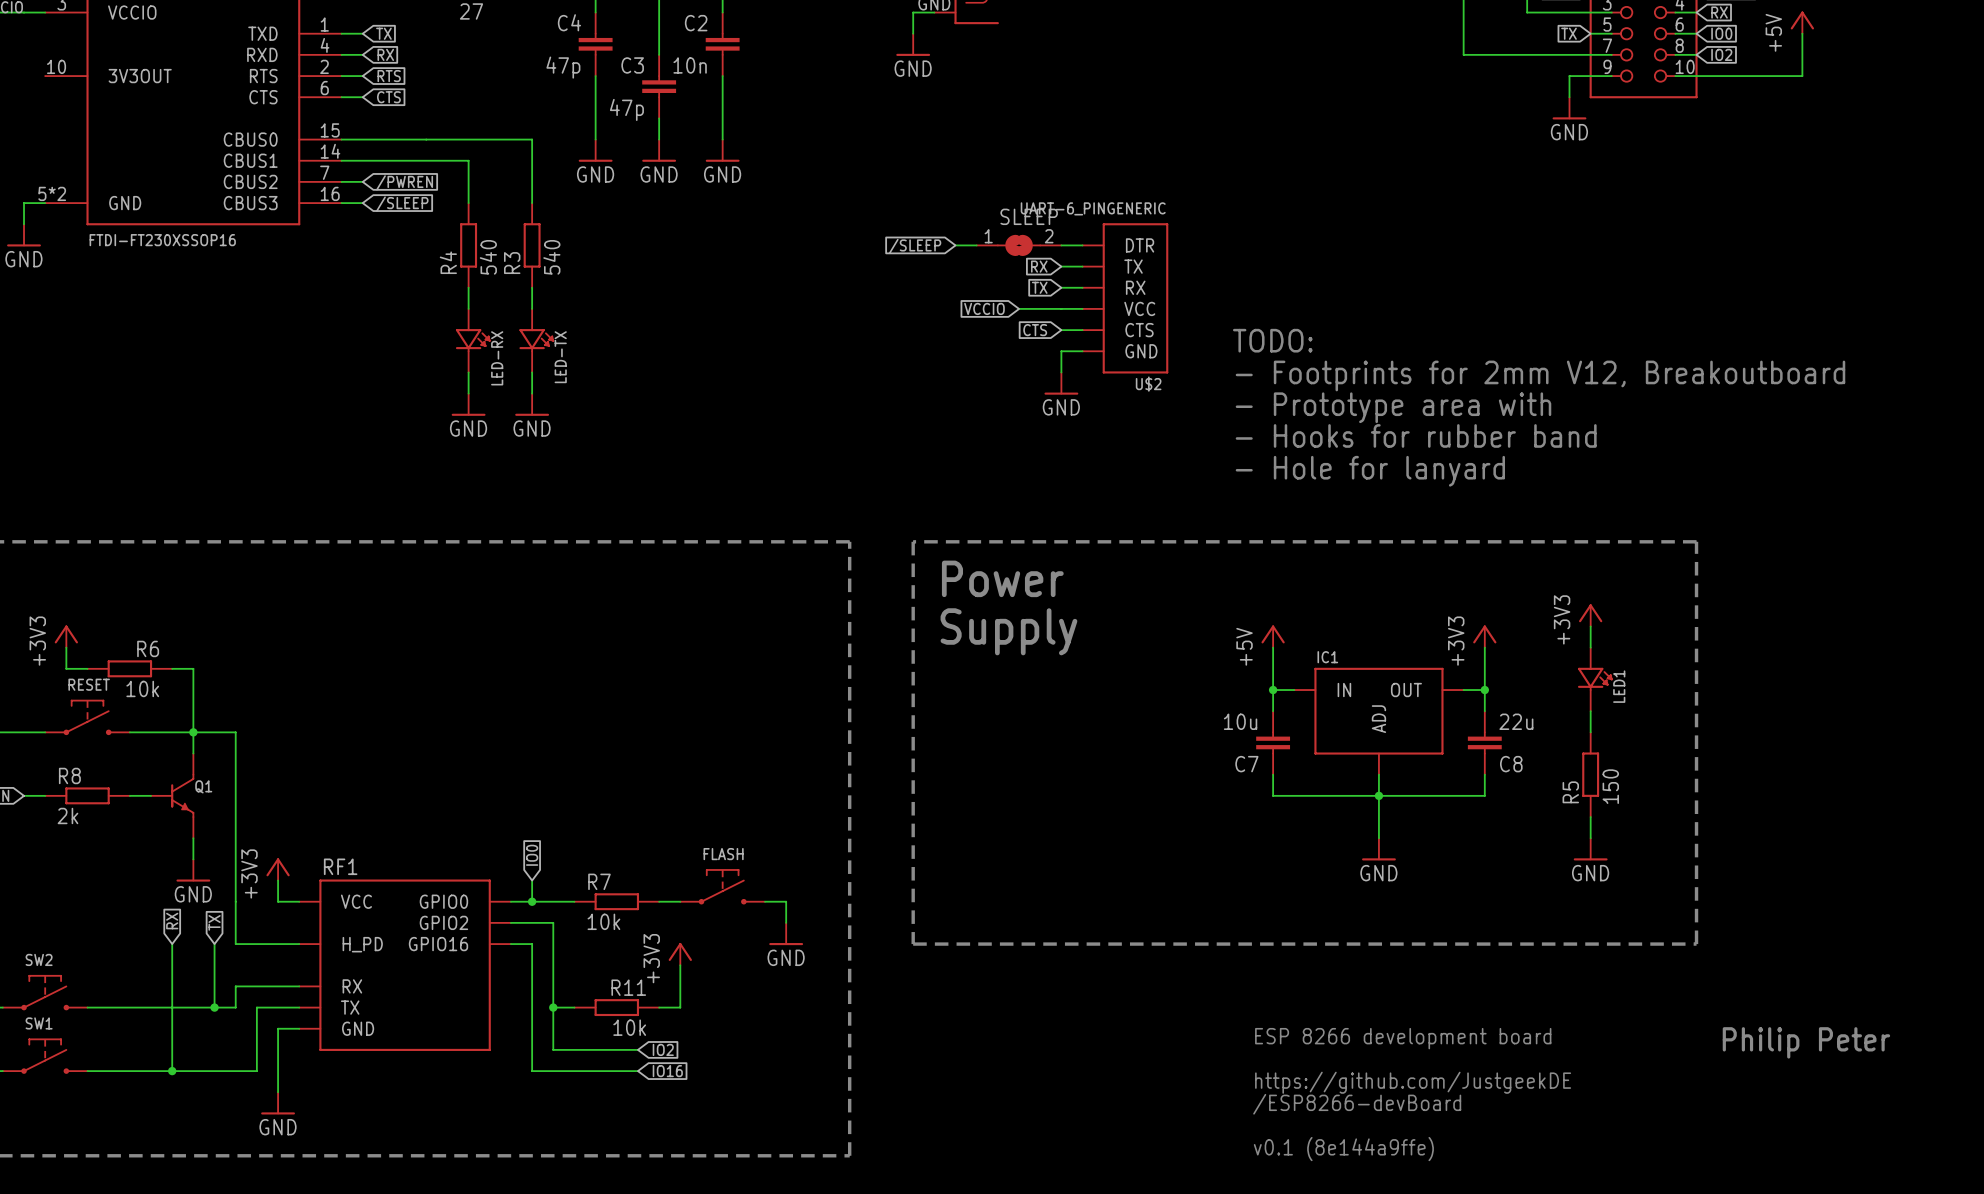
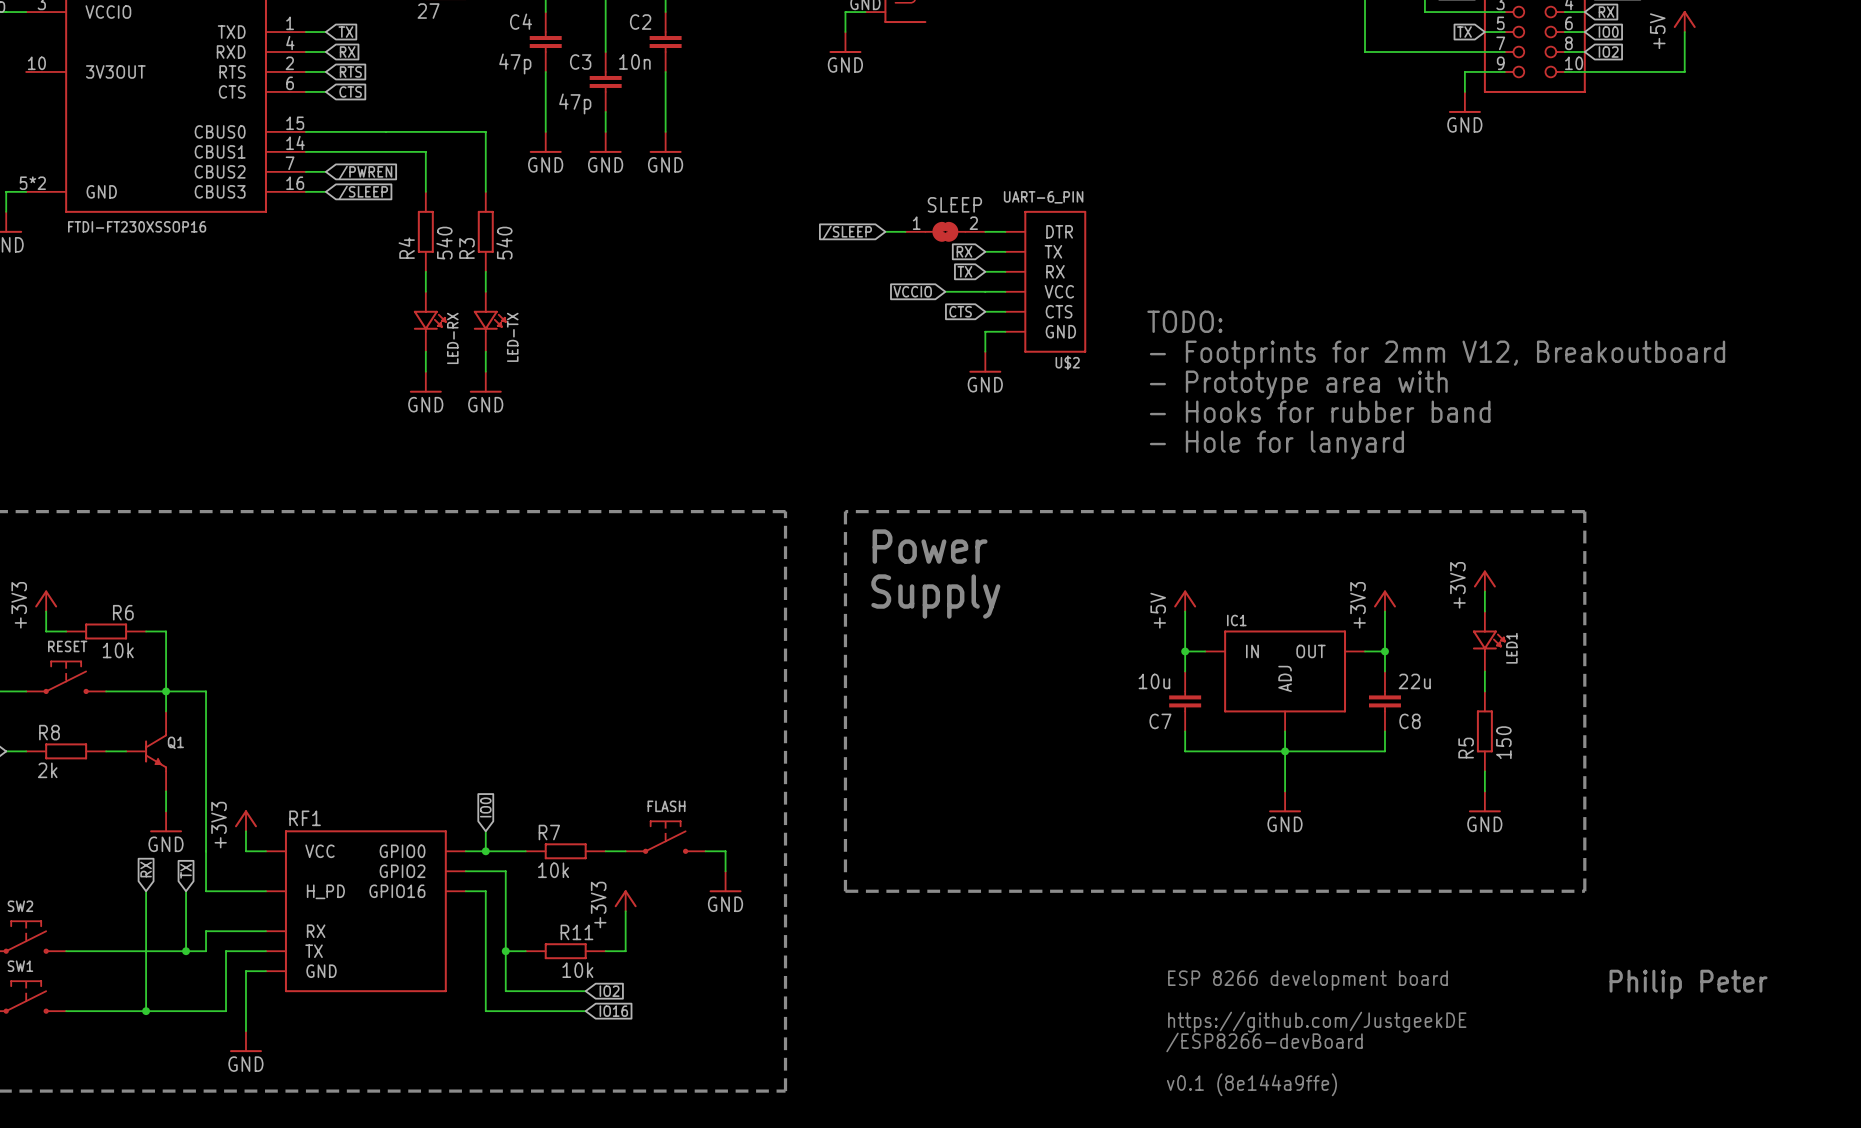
U$2 value: UART-6_PINGENERIC (1093, 208) -> UART-6_PIN (1043, 197)

